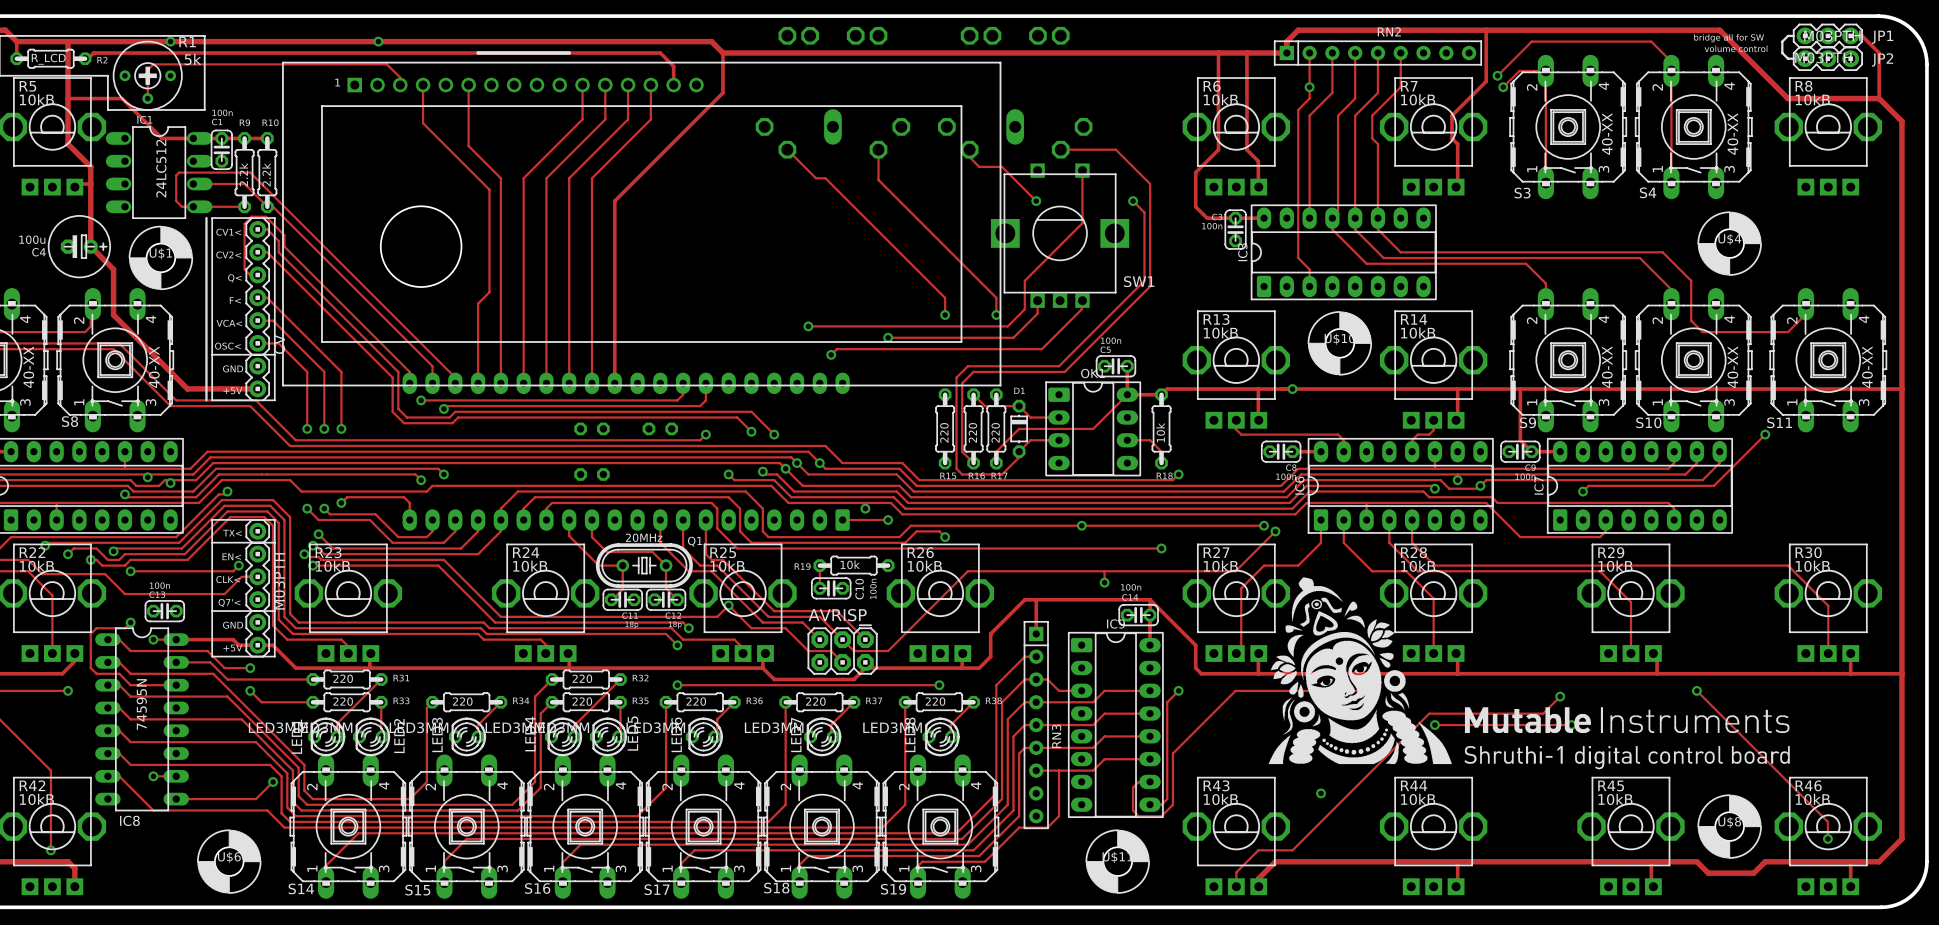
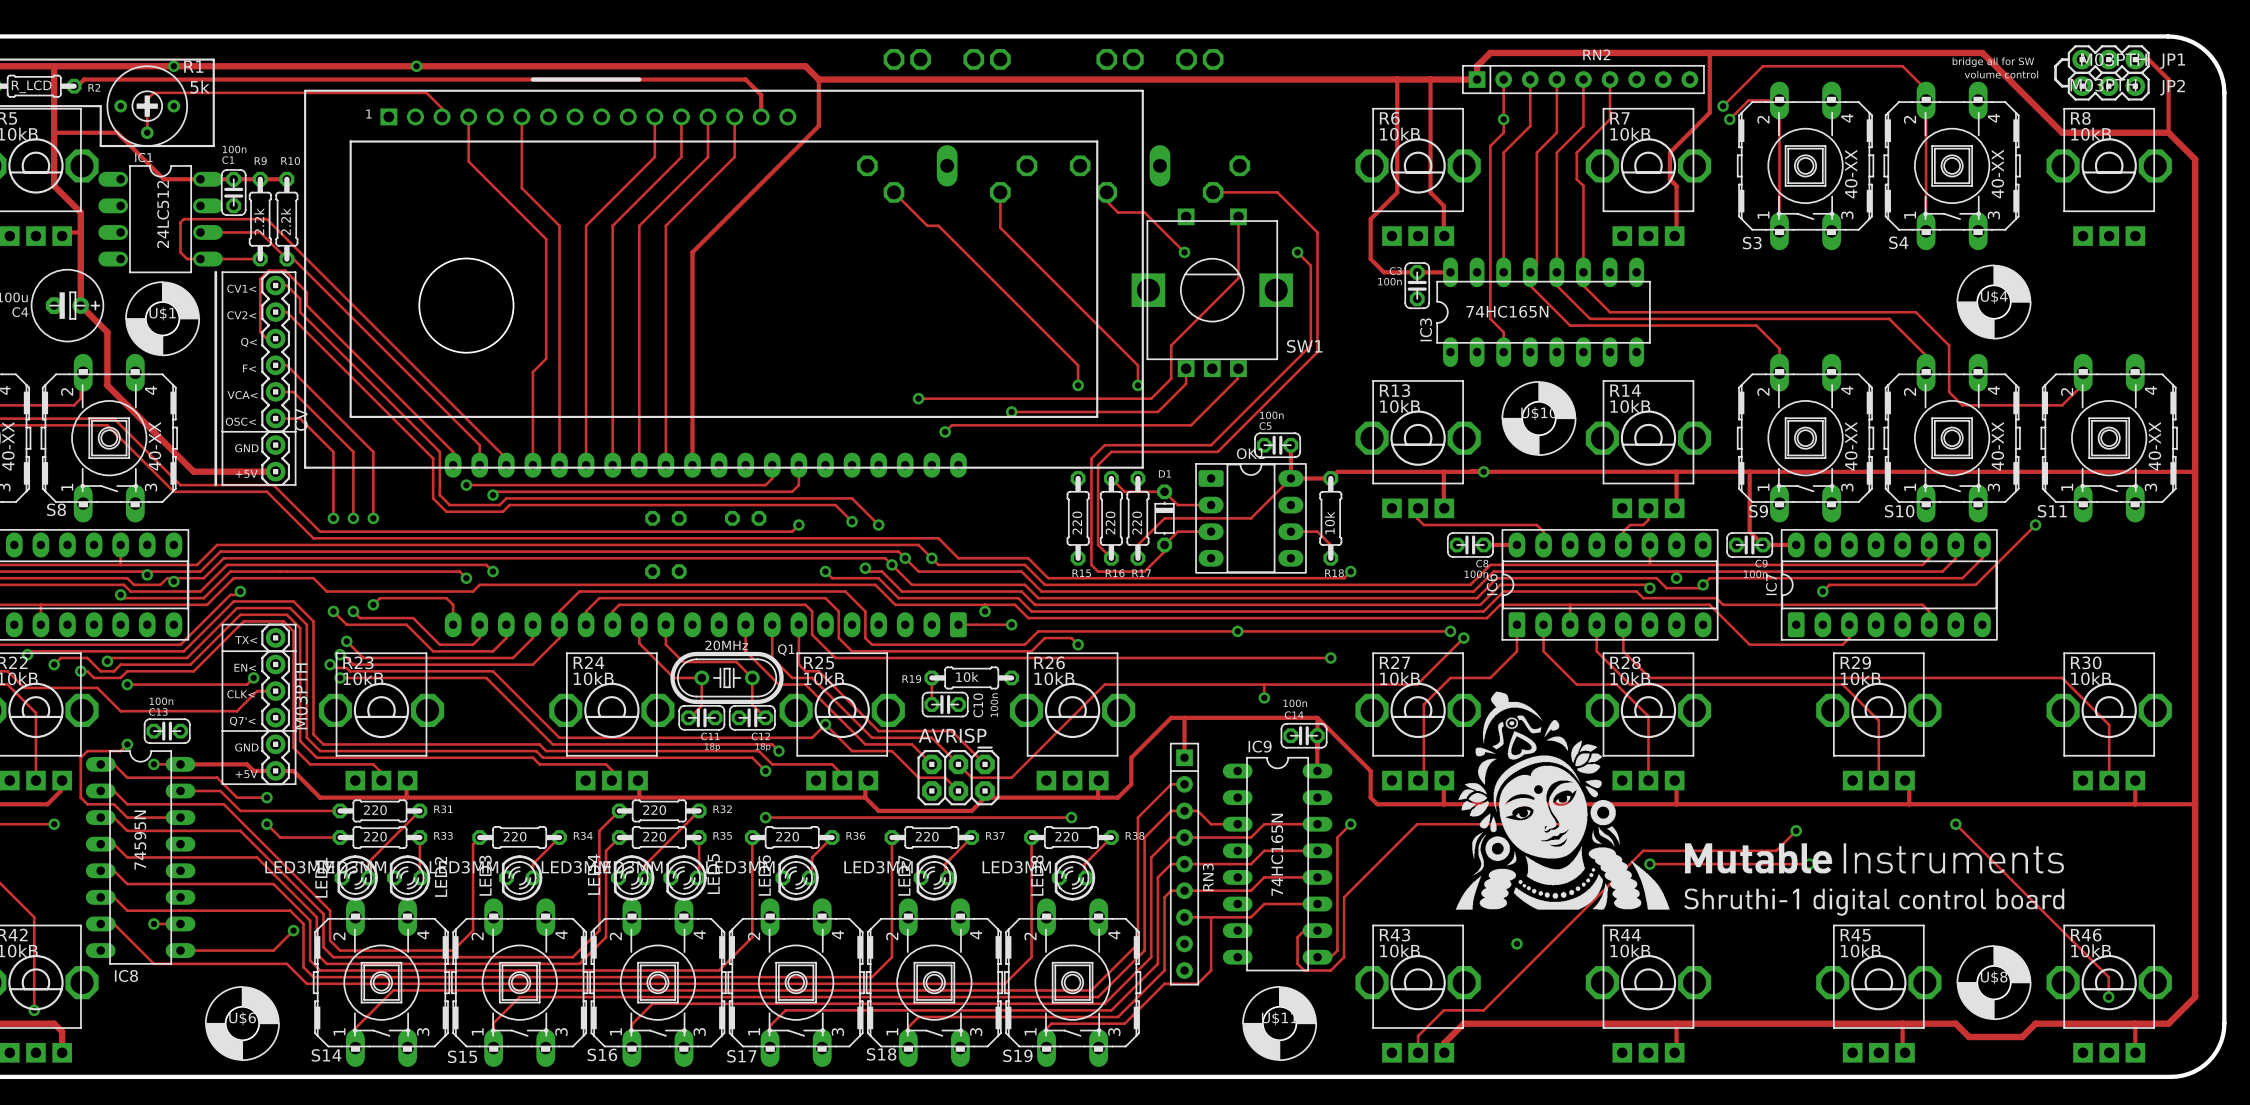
IC3 footprint: [1251, 204, 1437, 300] -> [1436, 257, 1651, 368]
IC3 value: none -> 74HC165N (1507, 311)
IC9 footprint: [1068, 632, 1164, 818] -> [1222, 756, 1333, 972]
IC9 value: none -> 74HC165N (1277, 854)

